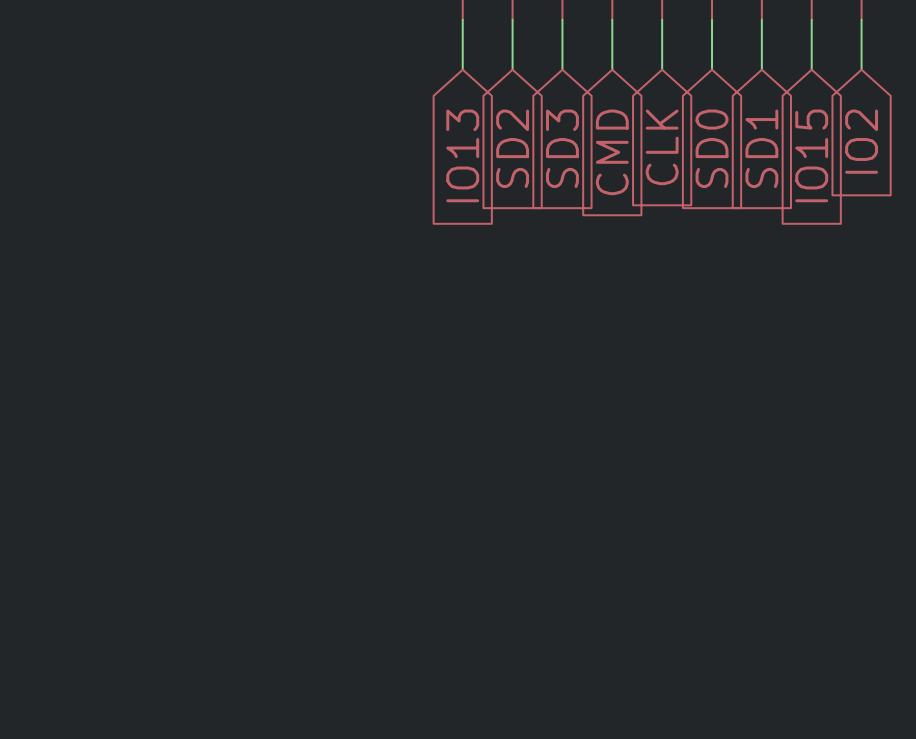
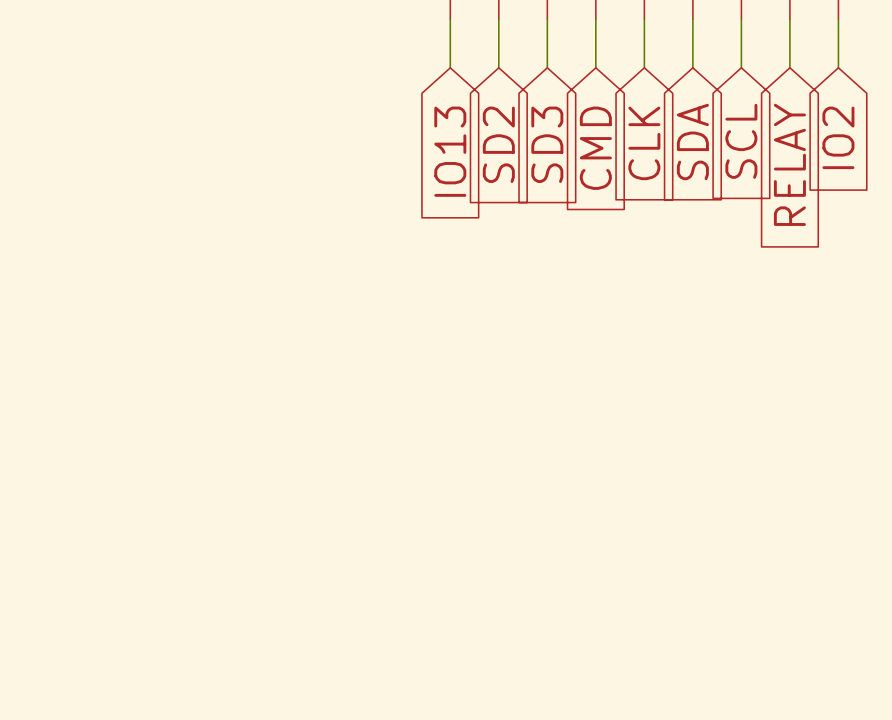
global label: SD0 (712, 148) -> SDA (692, 142)
global label: SD1 (761, 148) -> SCL (741, 141)
global label: IO15 (811, 155) -> RELAY (789, 164)

